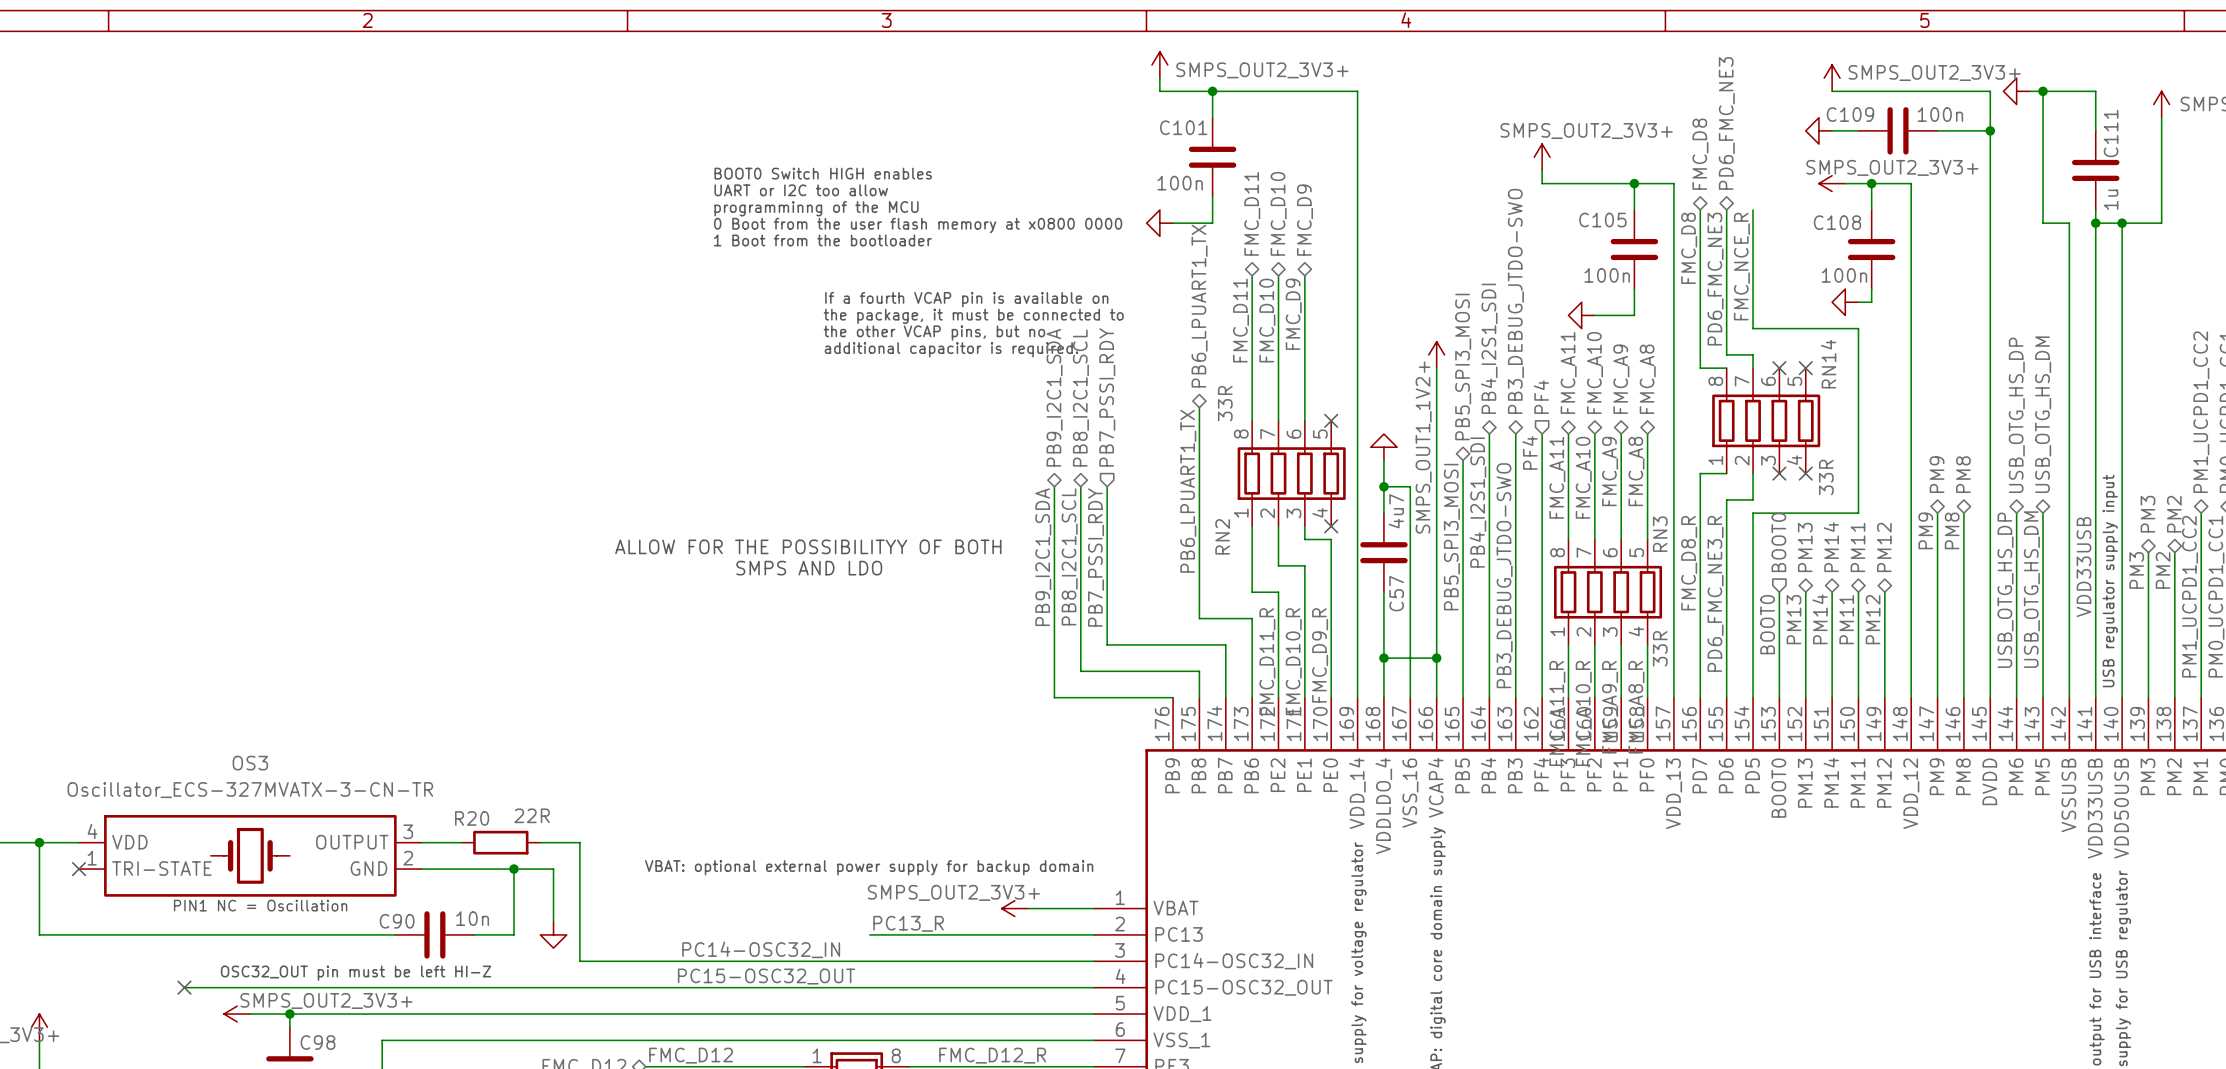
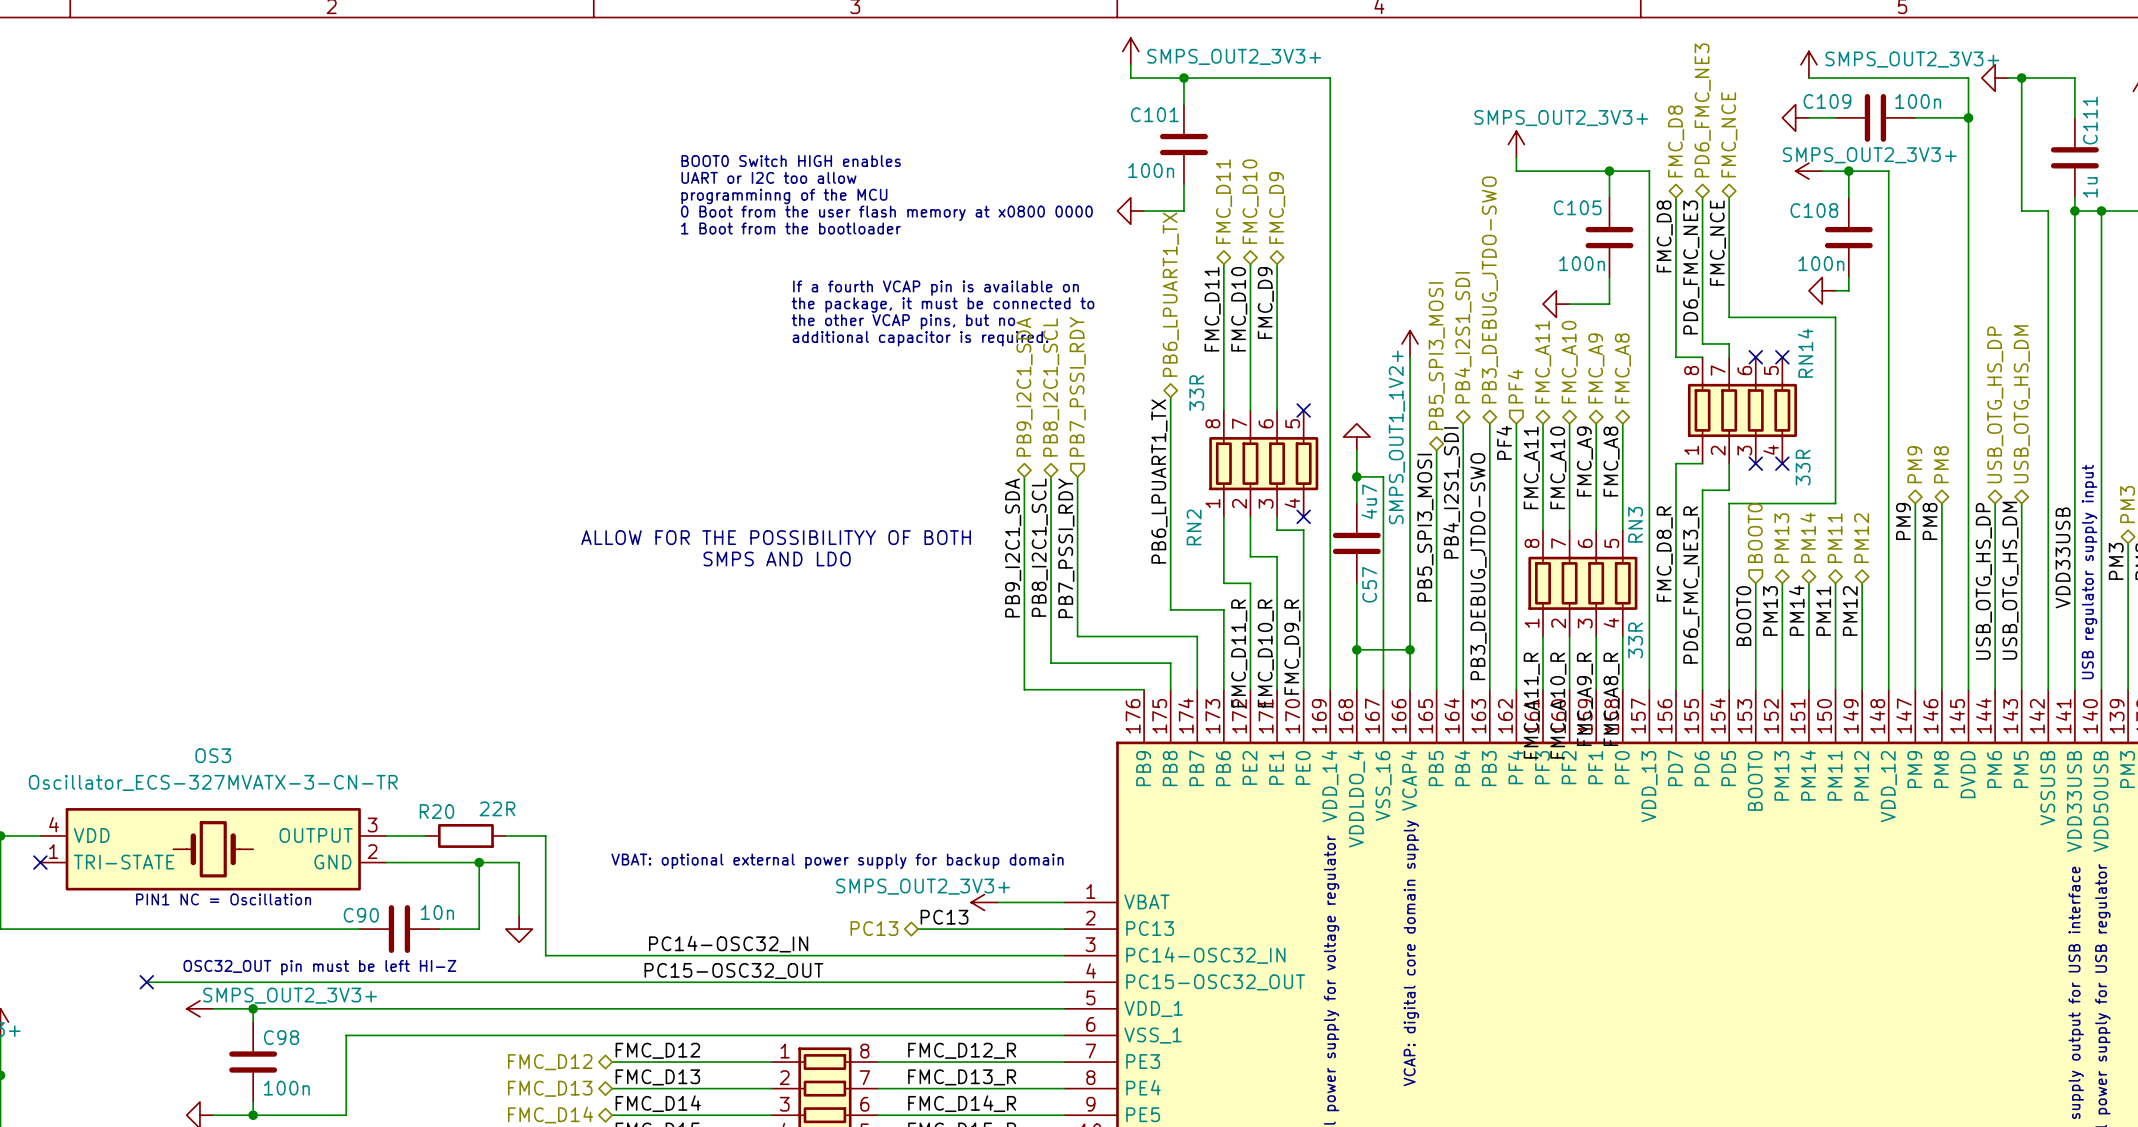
hierarchical label: none -> FMC_NCE (1729, 134)
label: FMC_NCE_R (1741, 266) -> FMC_NCE (1717, 243)
label: PC13_R (908, 923) -> PC13 (944, 917)
wire: (869, 934) (948, 934) -> none
hierarchical label: none -> PC13 (874, 928)

